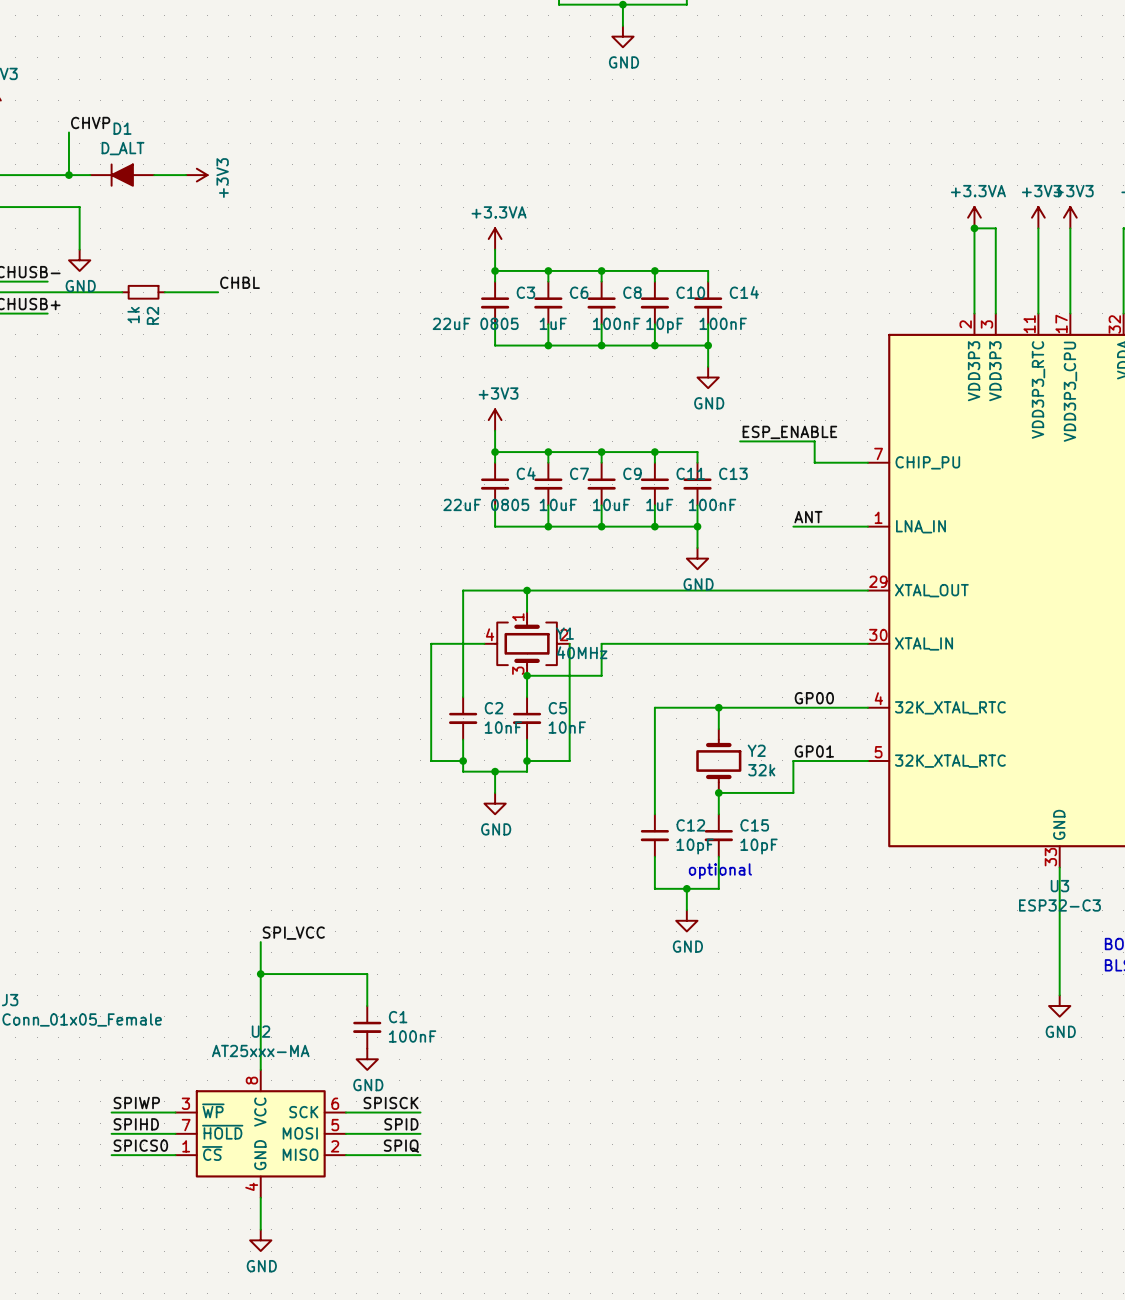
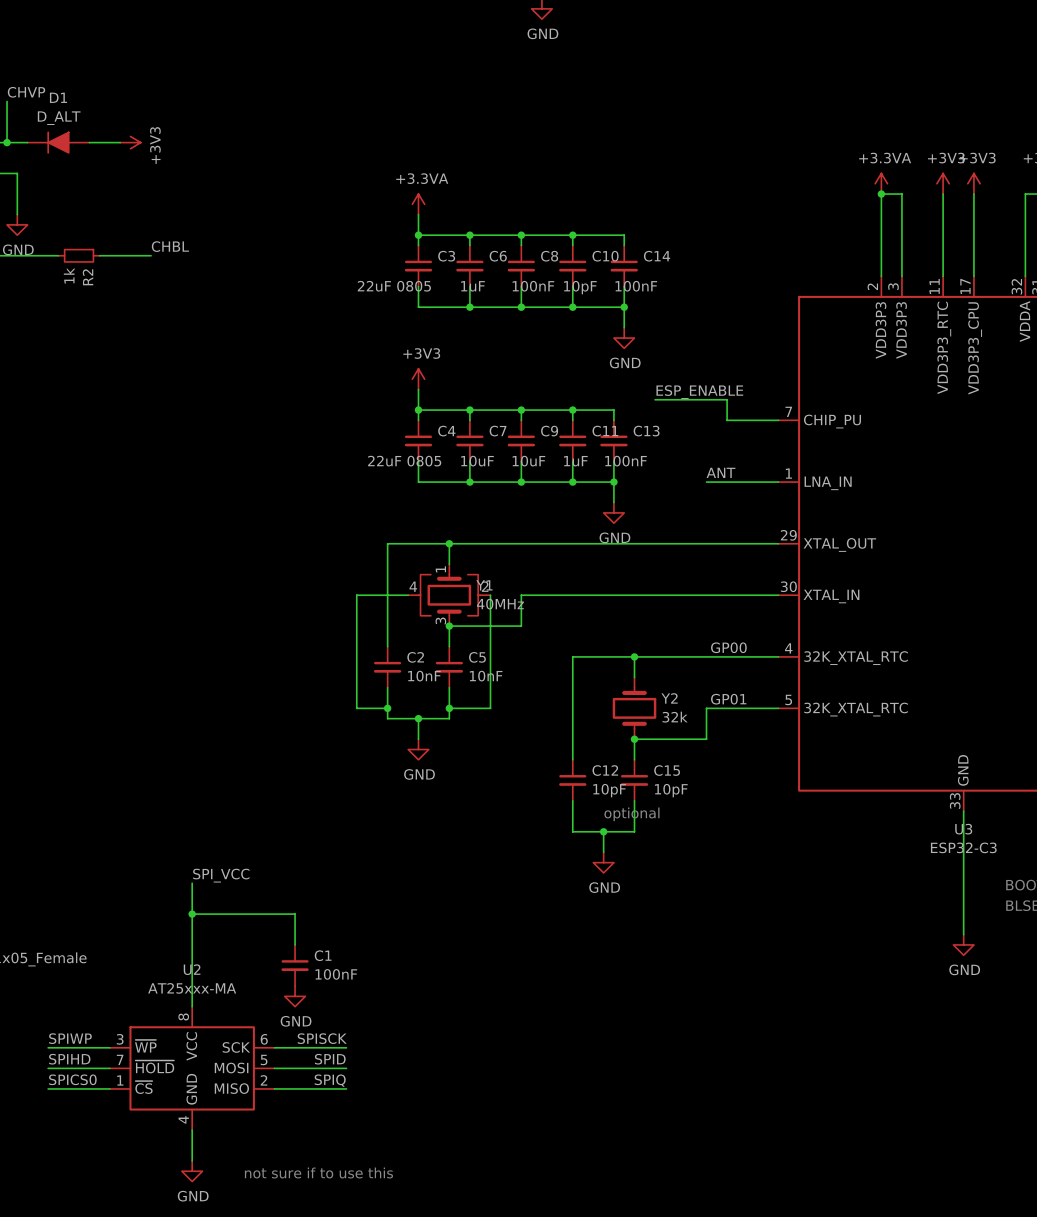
text: none -> not sure if to use this (318, 1173)

